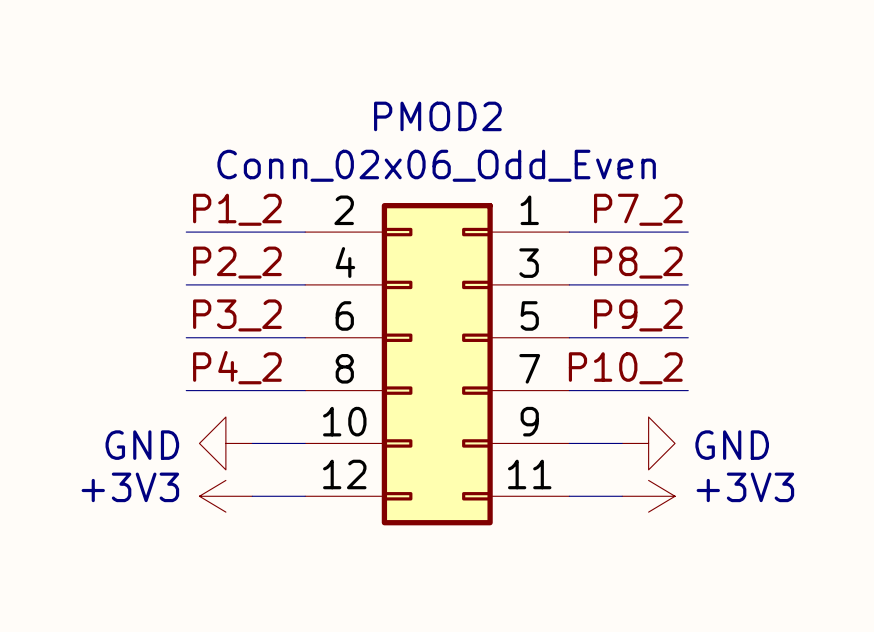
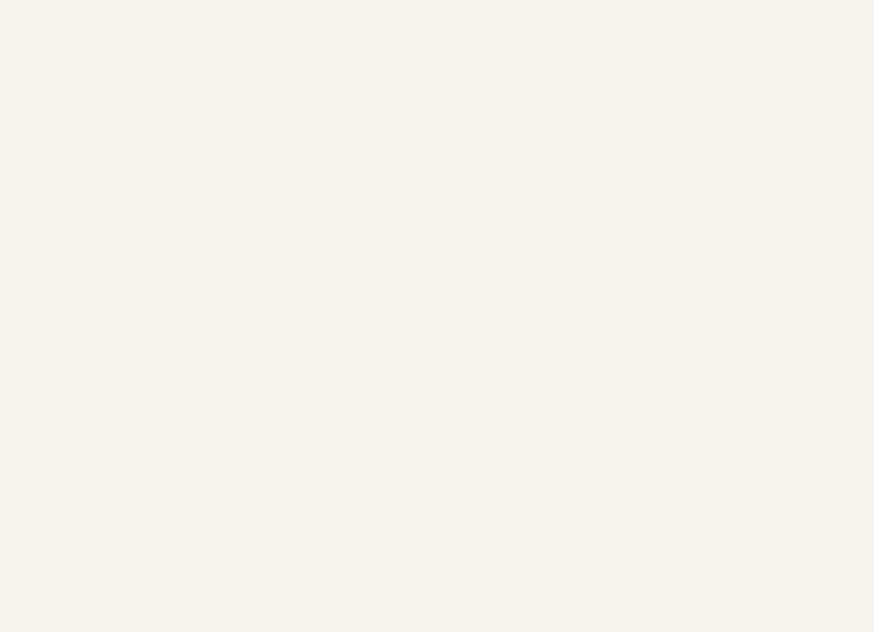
label: P1_2 (237, 209) -> none
label: P7_2 (638, 209) -> none
wire: (186, 232) (305, 232) -> none
wire: (569, 232) (688, 232) -> none
label: P2_2 (237, 262) -> none
label: P8_2 (638, 262) -> none
wire: (186, 284) (305, 284) -> none
wire: (569, 284) (688, 284) -> none
label: P3_2 (237, 315) -> none
label: P9_2 (638, 315) -> none
wire: (186, 337) (305, 337) -> none
wire: (569, 337) (688, 337) -> none
PMOD2: Conn_02x06_Odd_Even (437, 364) -> none
label: P4_2 (237, 367) -> none
label: P10_2 (625, 368) -> none
wire: (186, 390) (305, 390) -> none
wire: (569, 390) (688, 390) -> none
power symbol: GND (225, 443) -> none
wire: (252, 443) (305, 443) -> none
wire: (569, 443) (622, 443) -> none
power symbol: GND (648, 443) -> none
power symbol: +3V3 (225, 496) -> none
wire: (252, 496) (305, 496) -> none
wire: (569, 496) (622, 496) -> none
power symbol: +3V3 (648, 496) -> none

